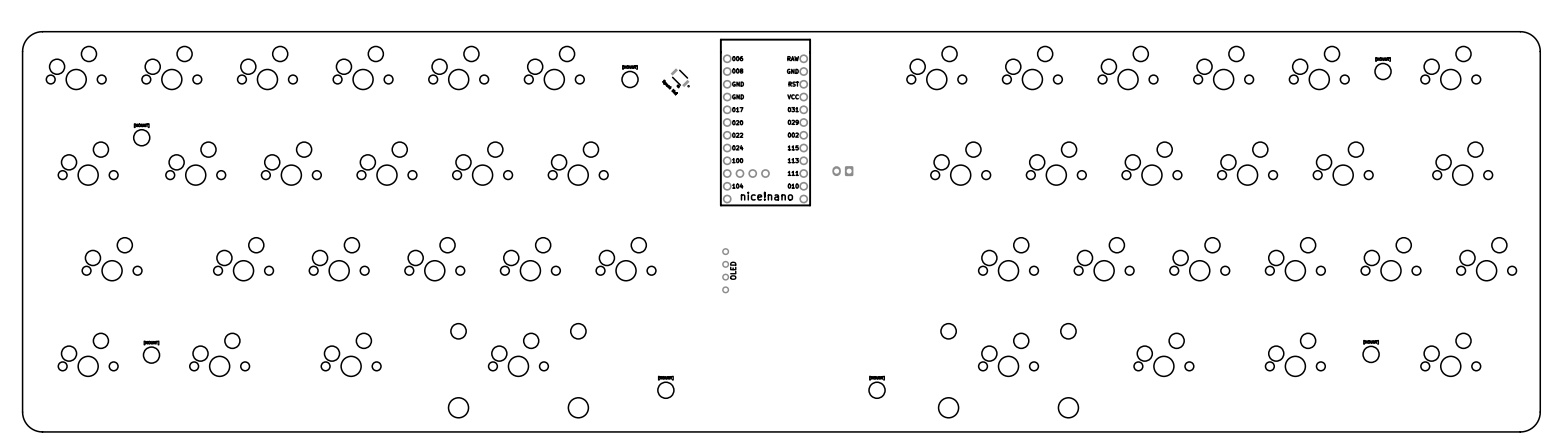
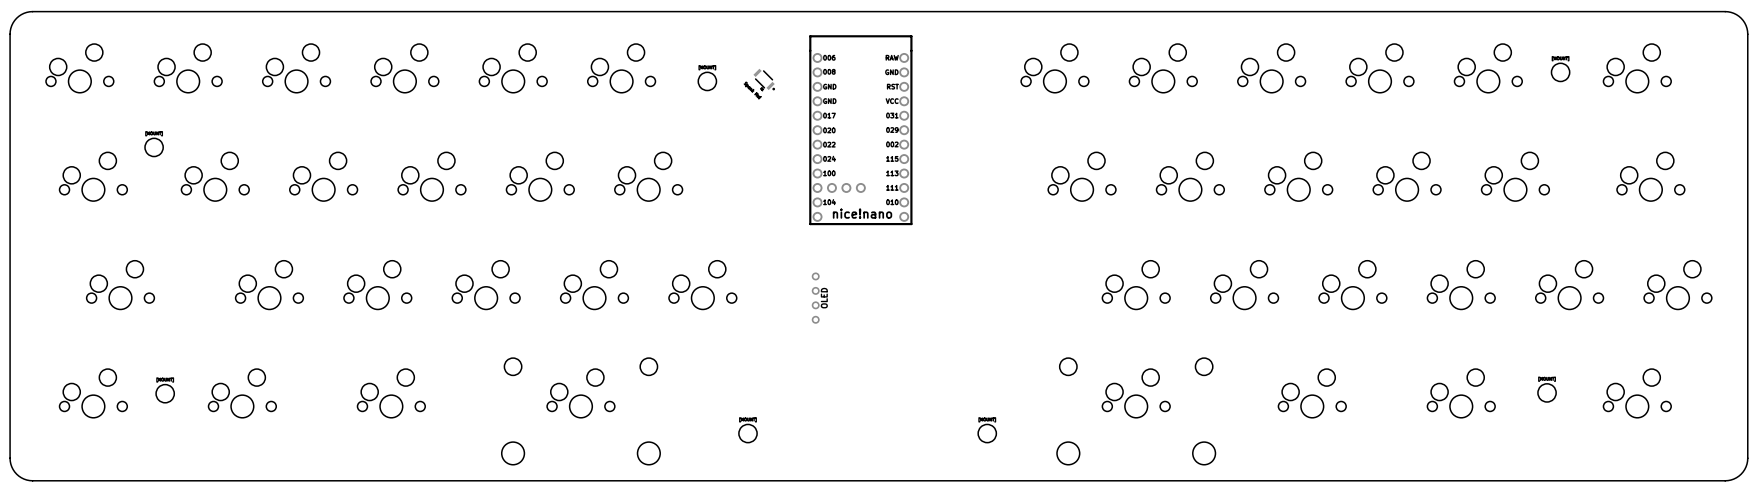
part: (842, 171) -> none
board edge: (42, 431) (34, 430) (28, 426) (24, 419) (22, 412) (22, 51) (26, 39) (37, 32) (1520, 31) (1527, 33) (1534, 37) (1538, 43) (1540, 51) (1540, 412) (1538, 419) (1534, 426) (1527, 430) (1520, 431) -> (41, 480) (26, 480) (18, 476) (11, 466) (10, 458) (10, 34) (14, 20) (26, 12) (1725, 11) (1733, 13) (1741, 18) (1746, 25) (1747, 34) (1747, 458) (1746, 466) (1738, 476) (1731, 480) (1716, 480)

